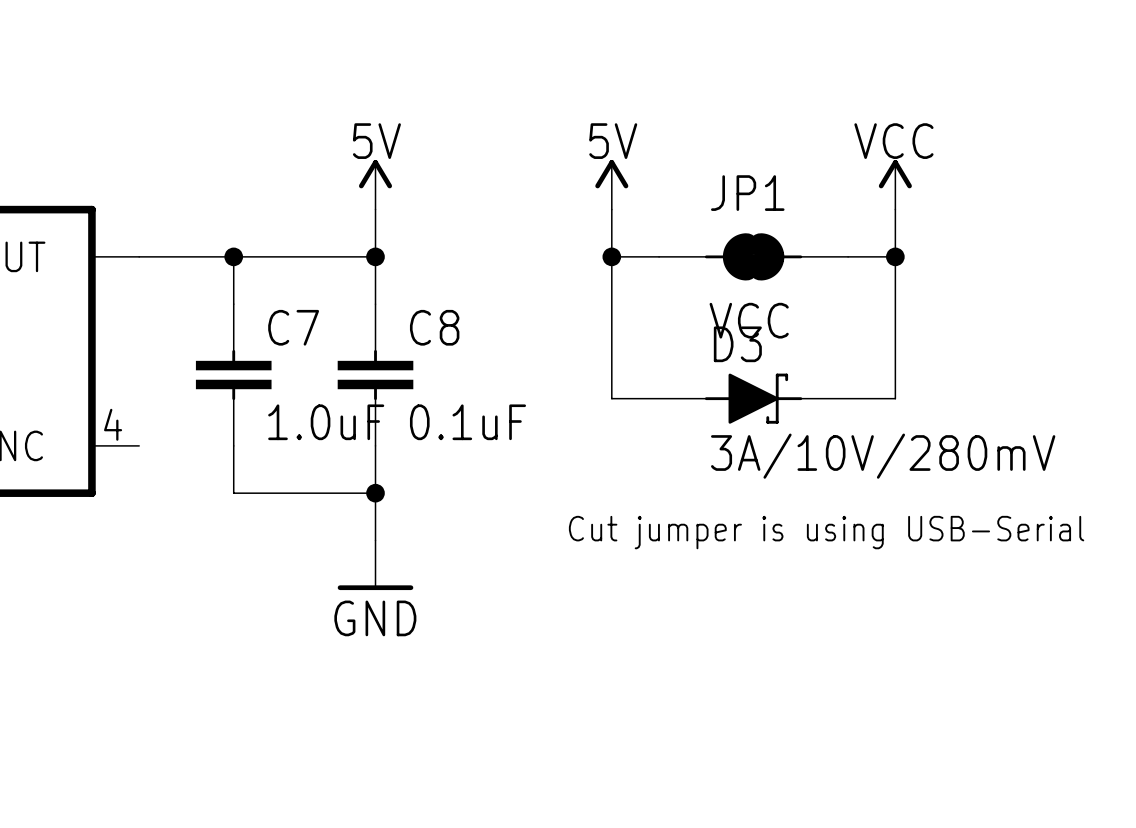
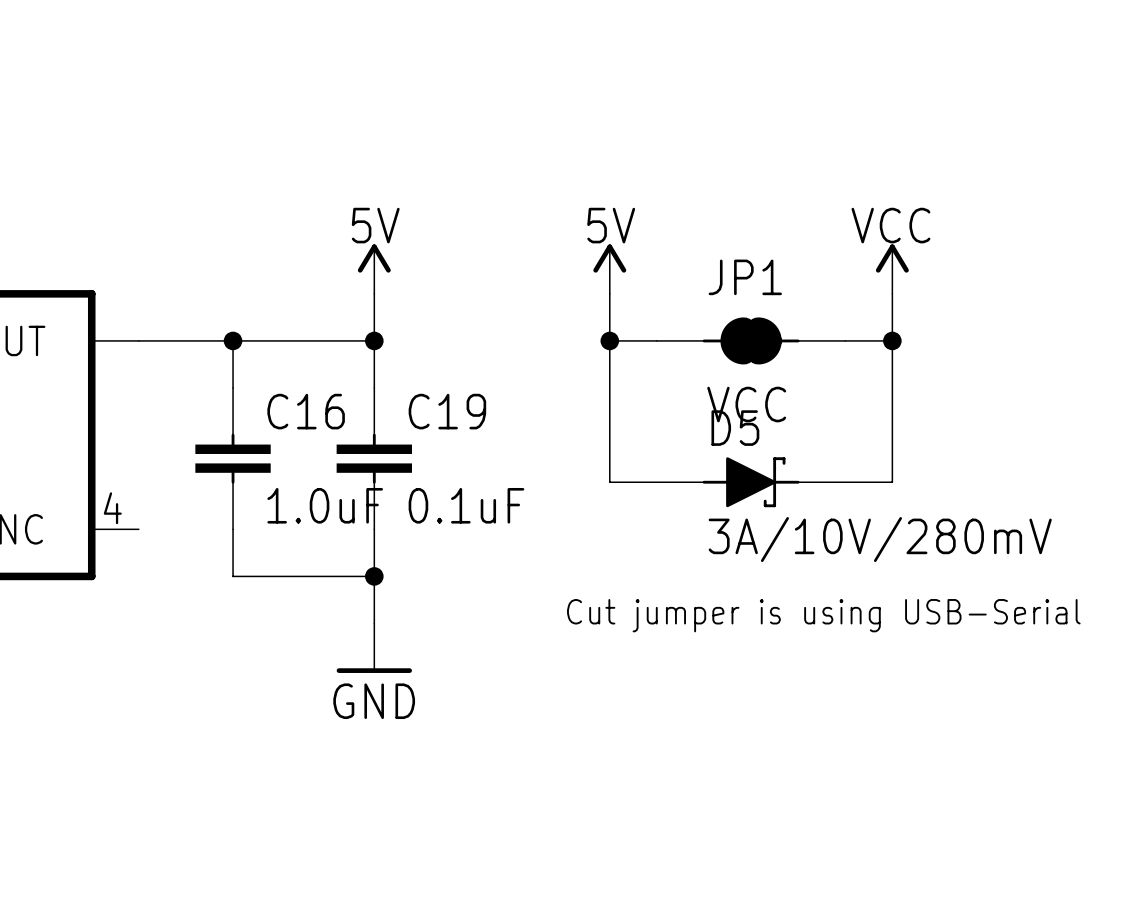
C7 name: C7 (293, 327) -> C16 (306, 411)
C8 name: C8 (434, 327) -> C19 (447, 411)
D3 name: D3 (737, 344) -> D5 (735, 428)

